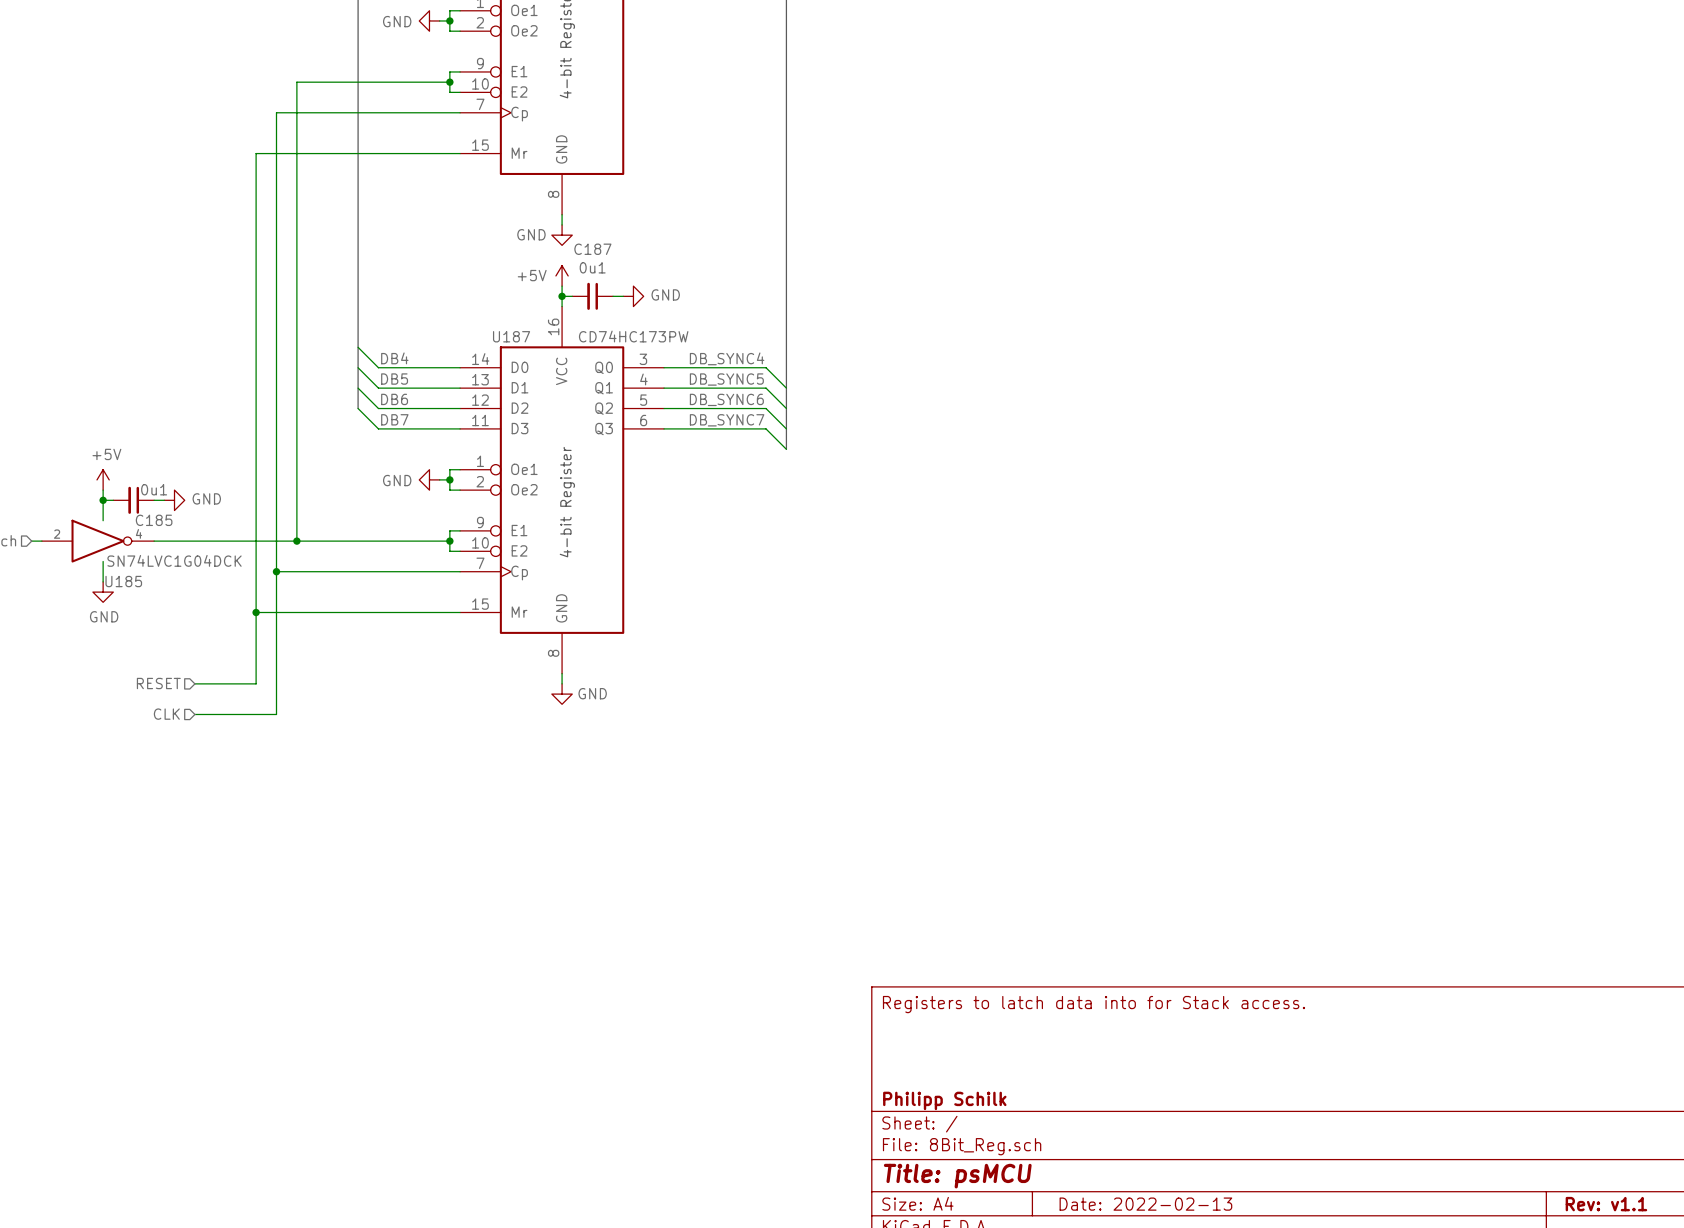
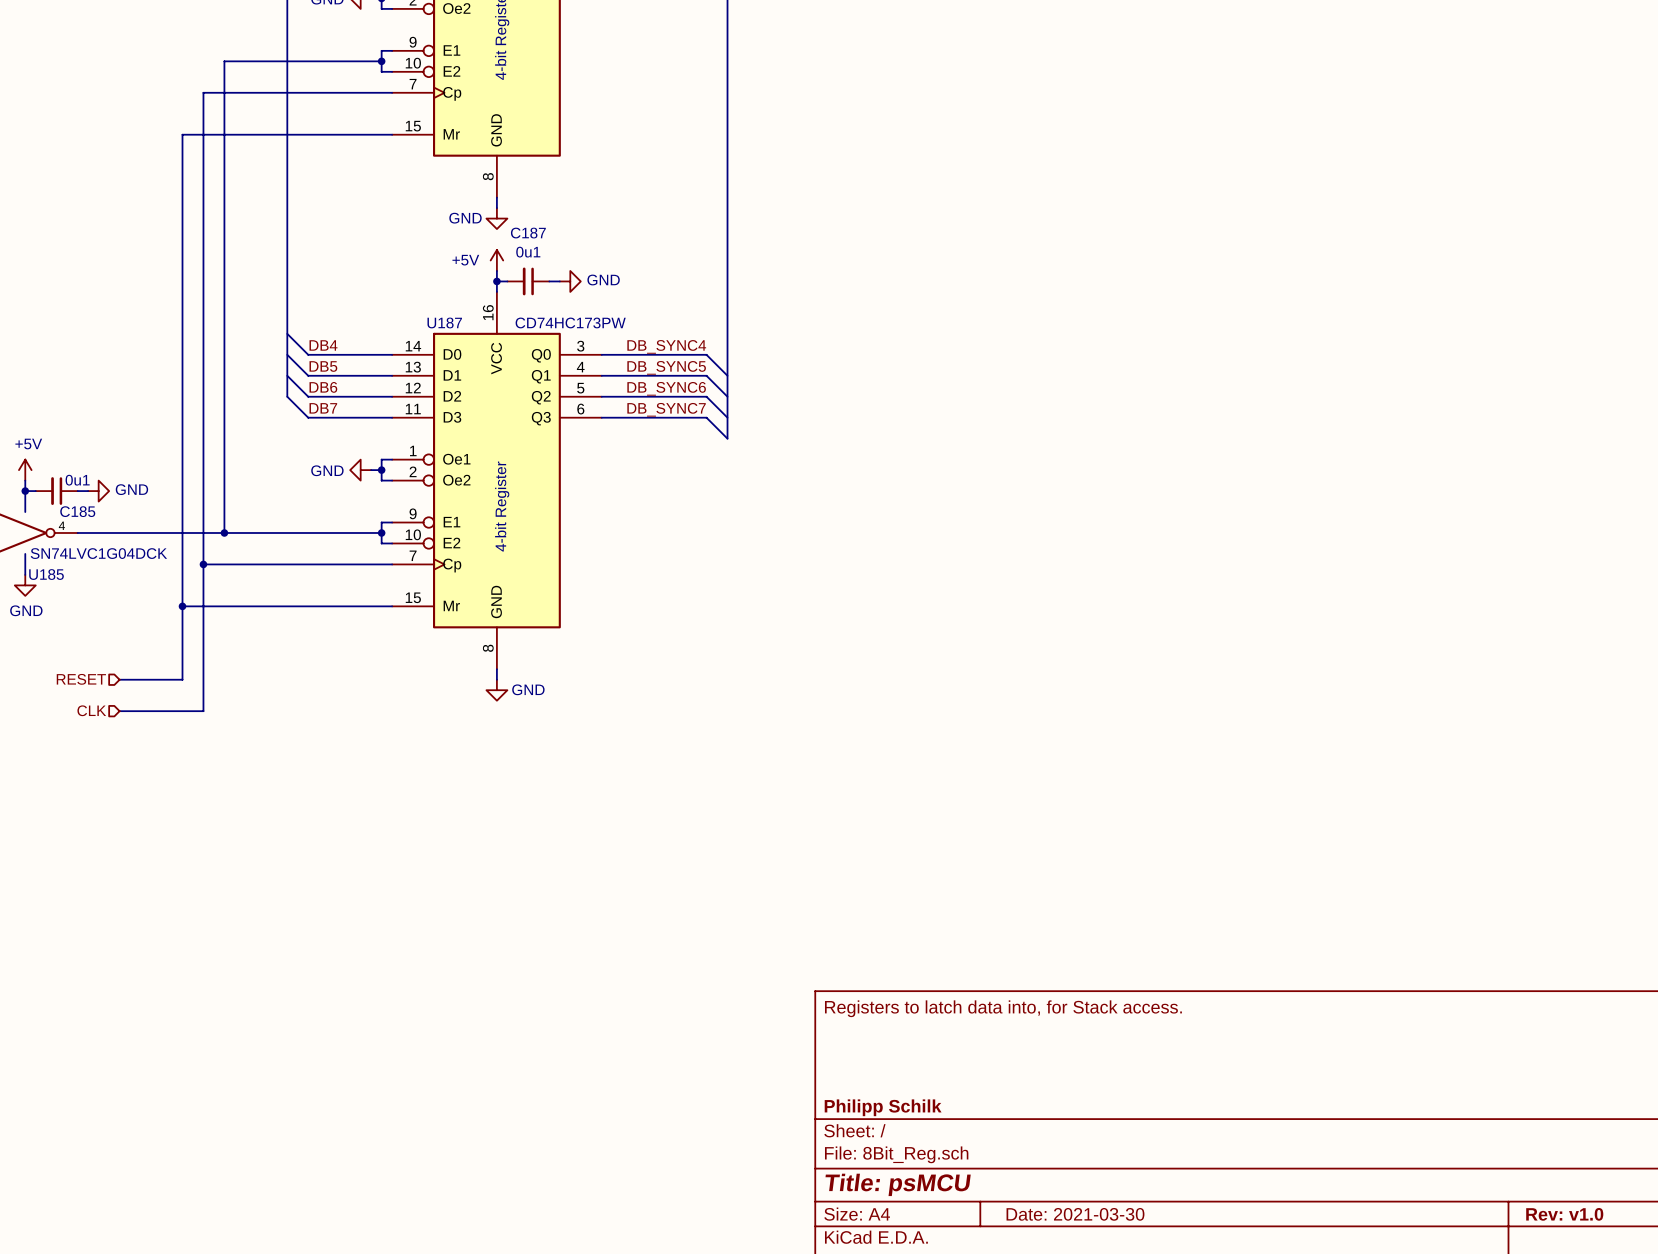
title block: Registers to latch data into for Stack access. (1094, 1004) -> Registers to latch data into, for Stack access. (1003, 1008)
title block: Date: 2022-02-13 (1145, 1204) -> Date: 2021-03-30 (1075, 1214)
title block: Rev: v1.1 (1606, 1204) -> Rev: v1.0 (1564, 1214)

